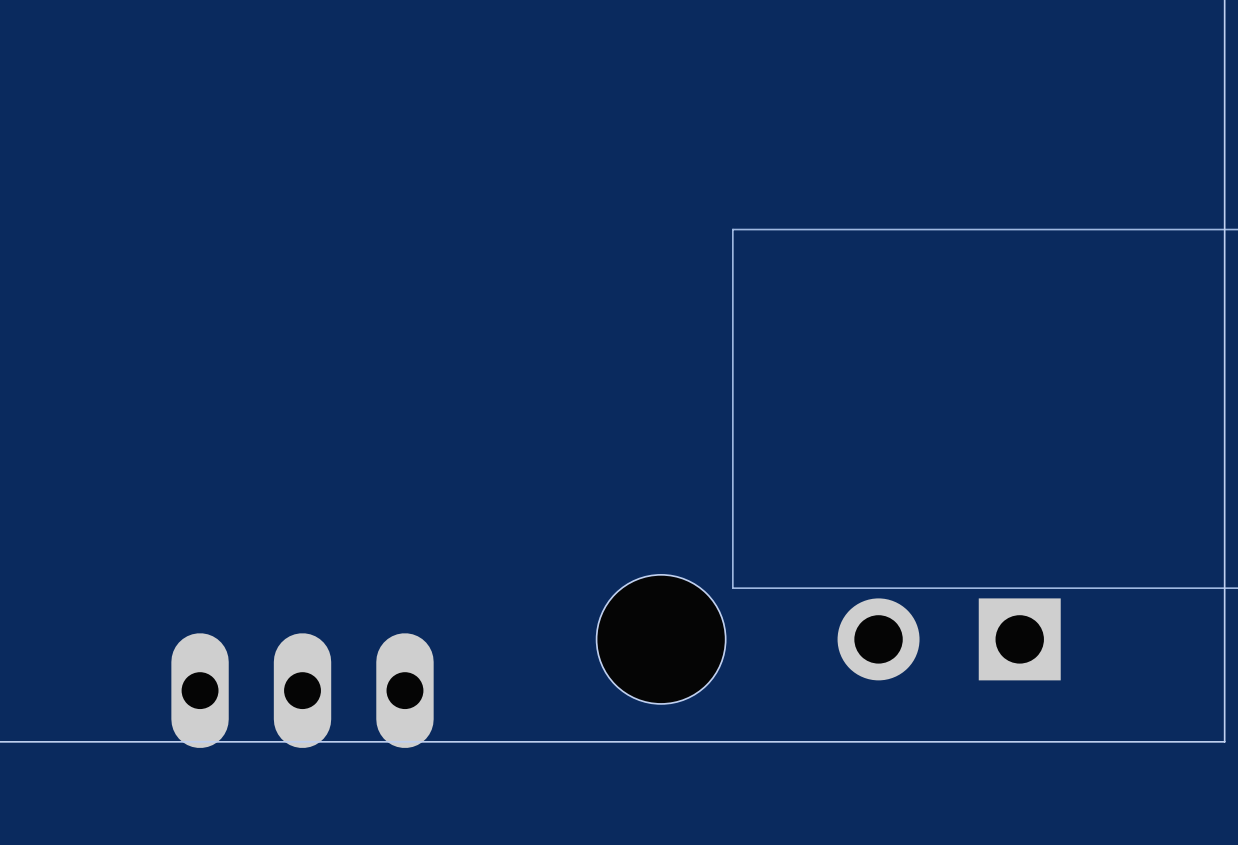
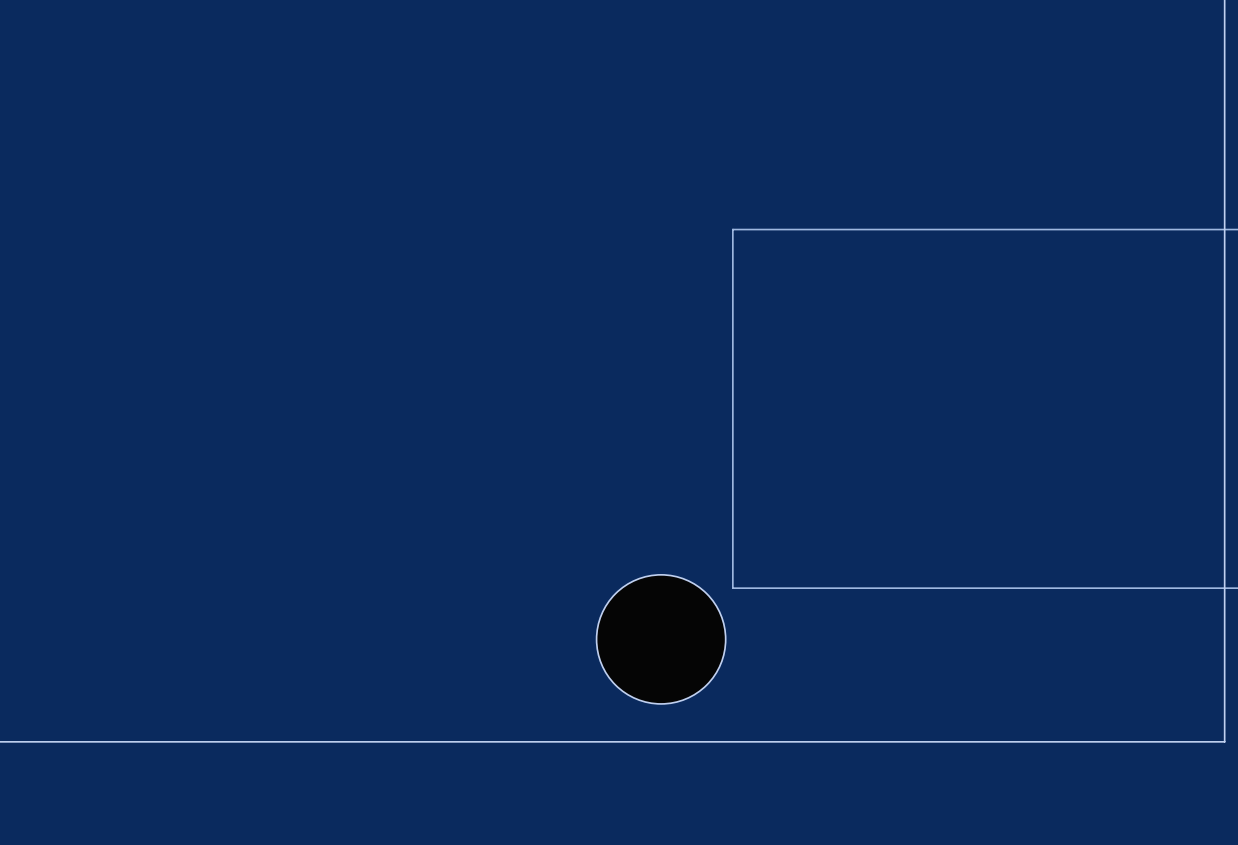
part: (949, 639) -> none
part: (302, 690) -> none

